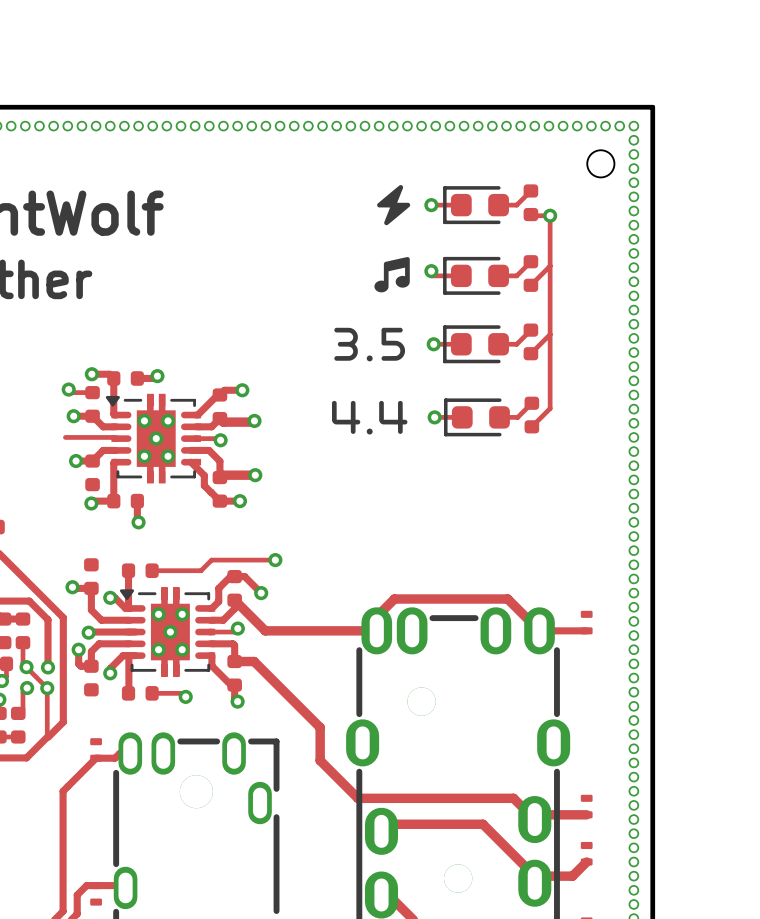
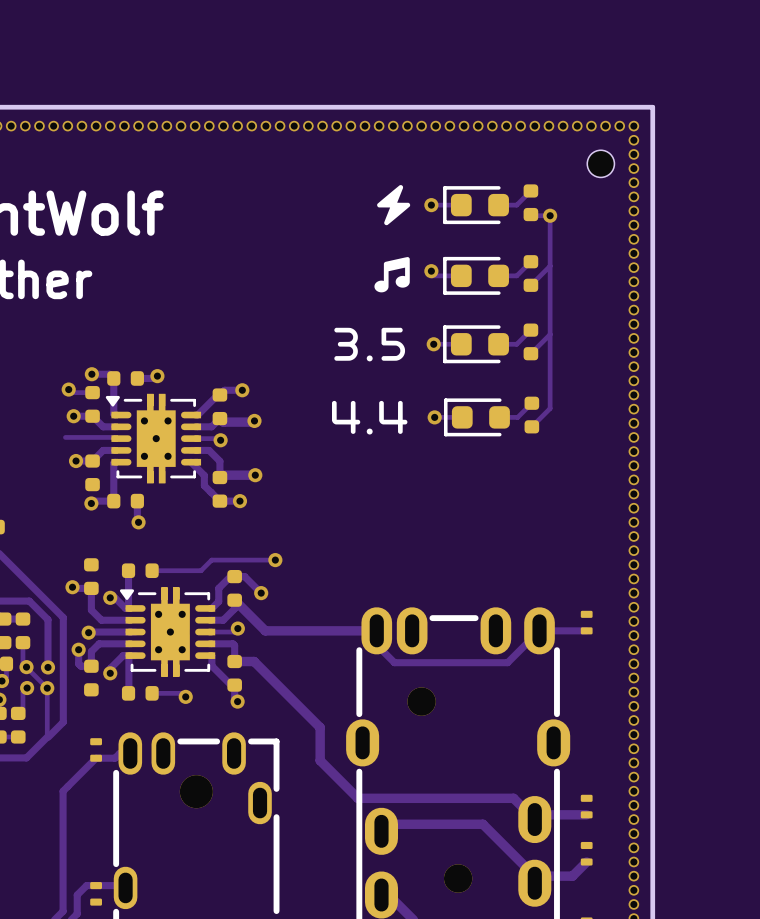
track: (376, 630) (376, 616) (394, 599) (507, 599) (539, 630) -> (376, 645) (394, 662) (507, 662) (539, 630)

